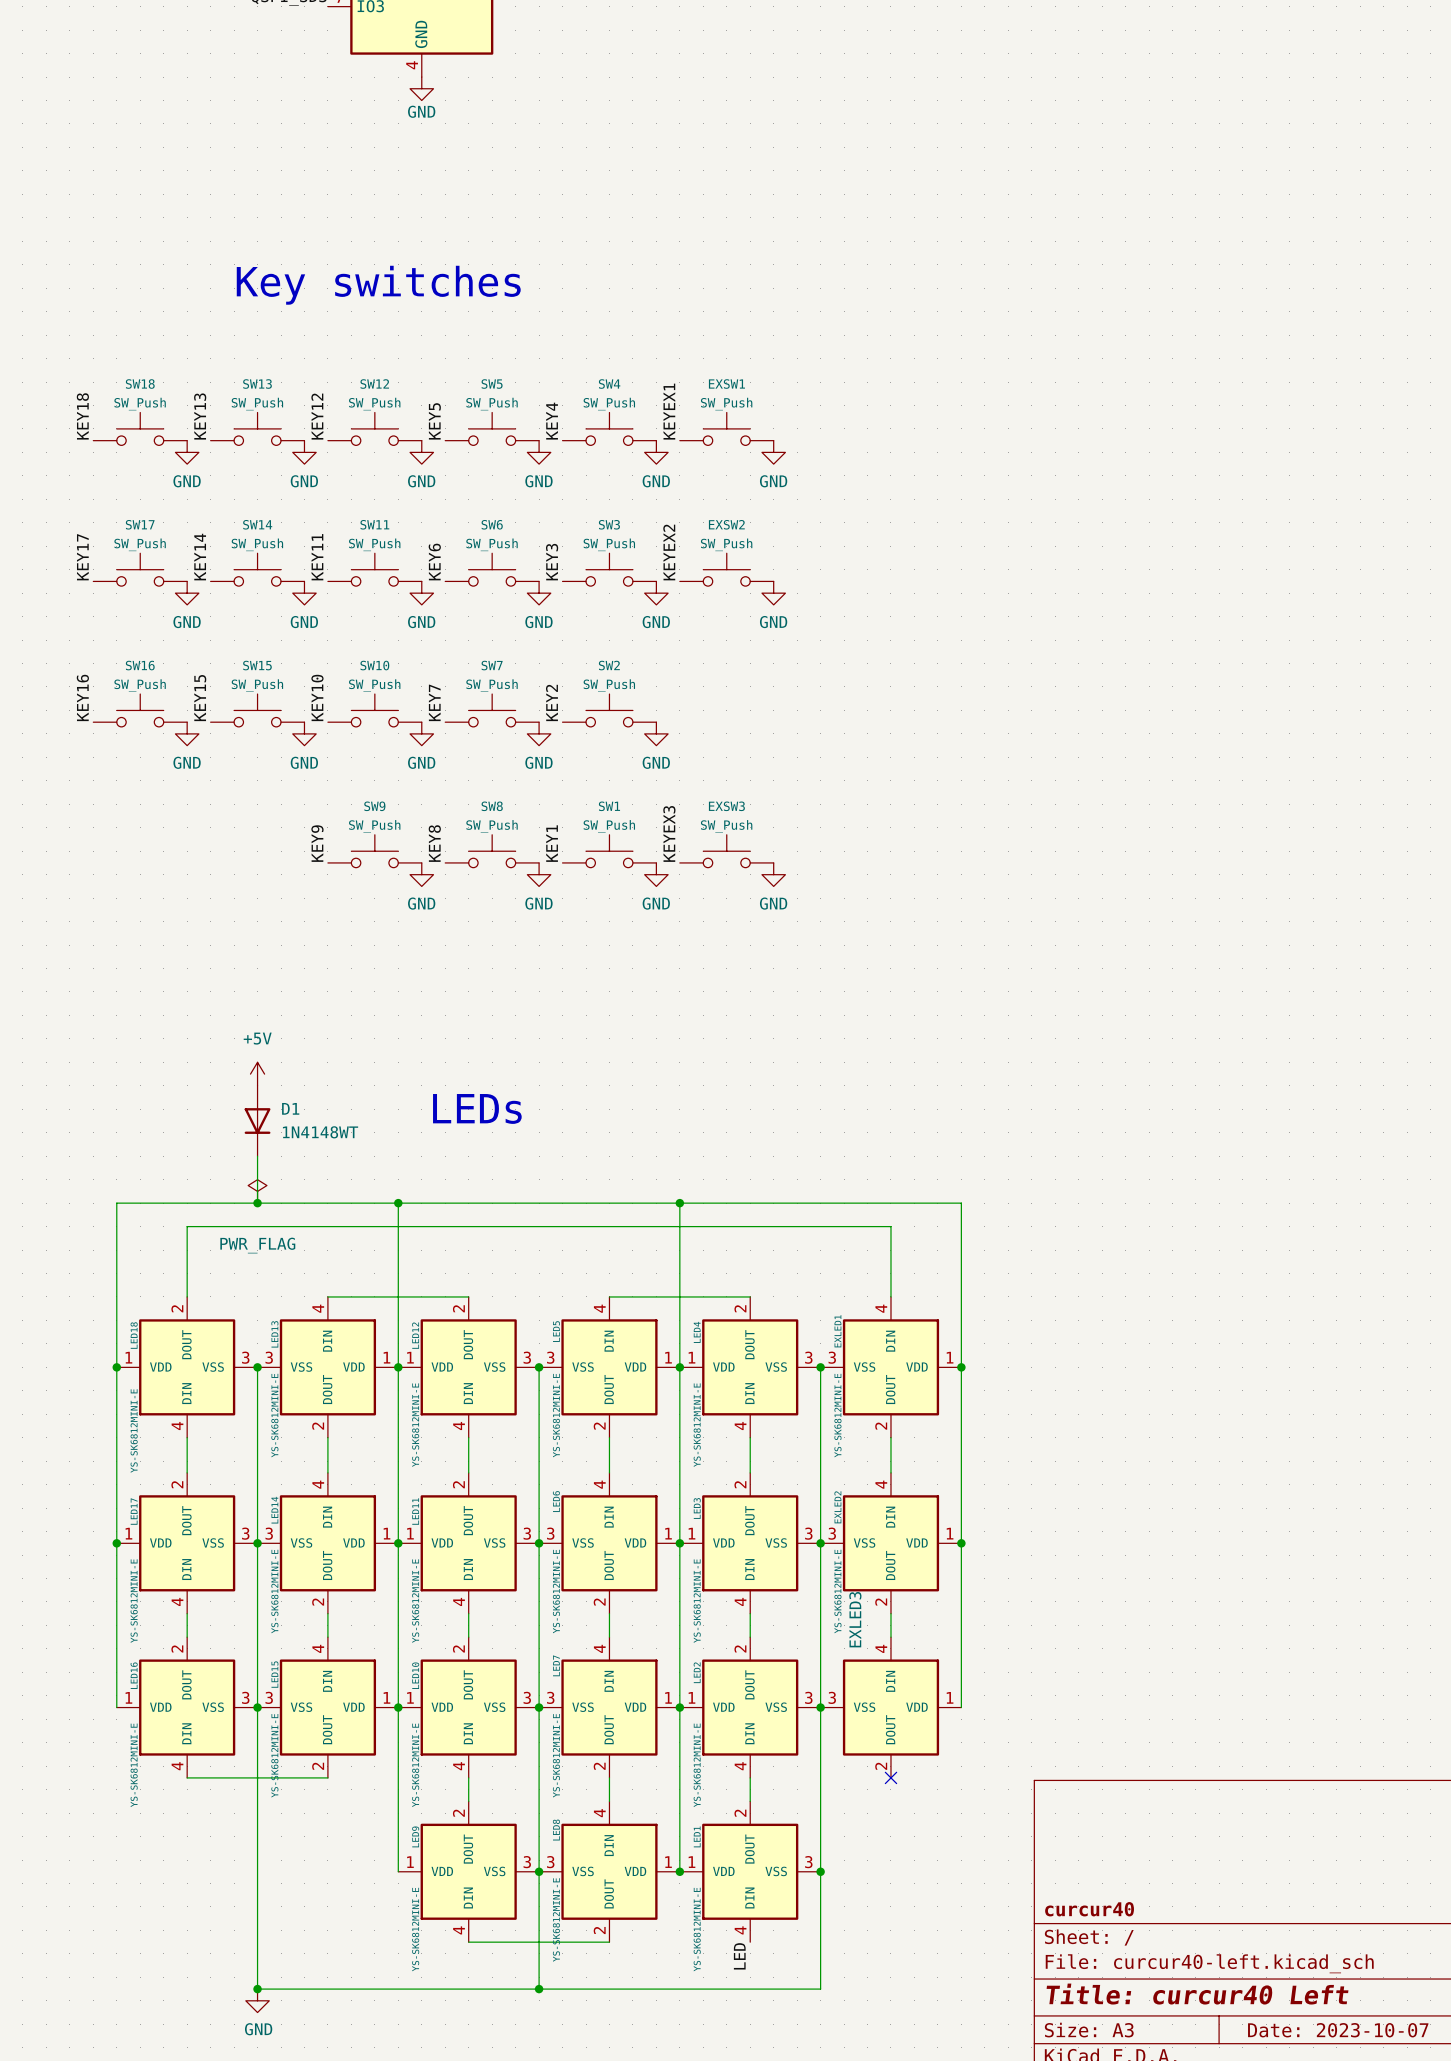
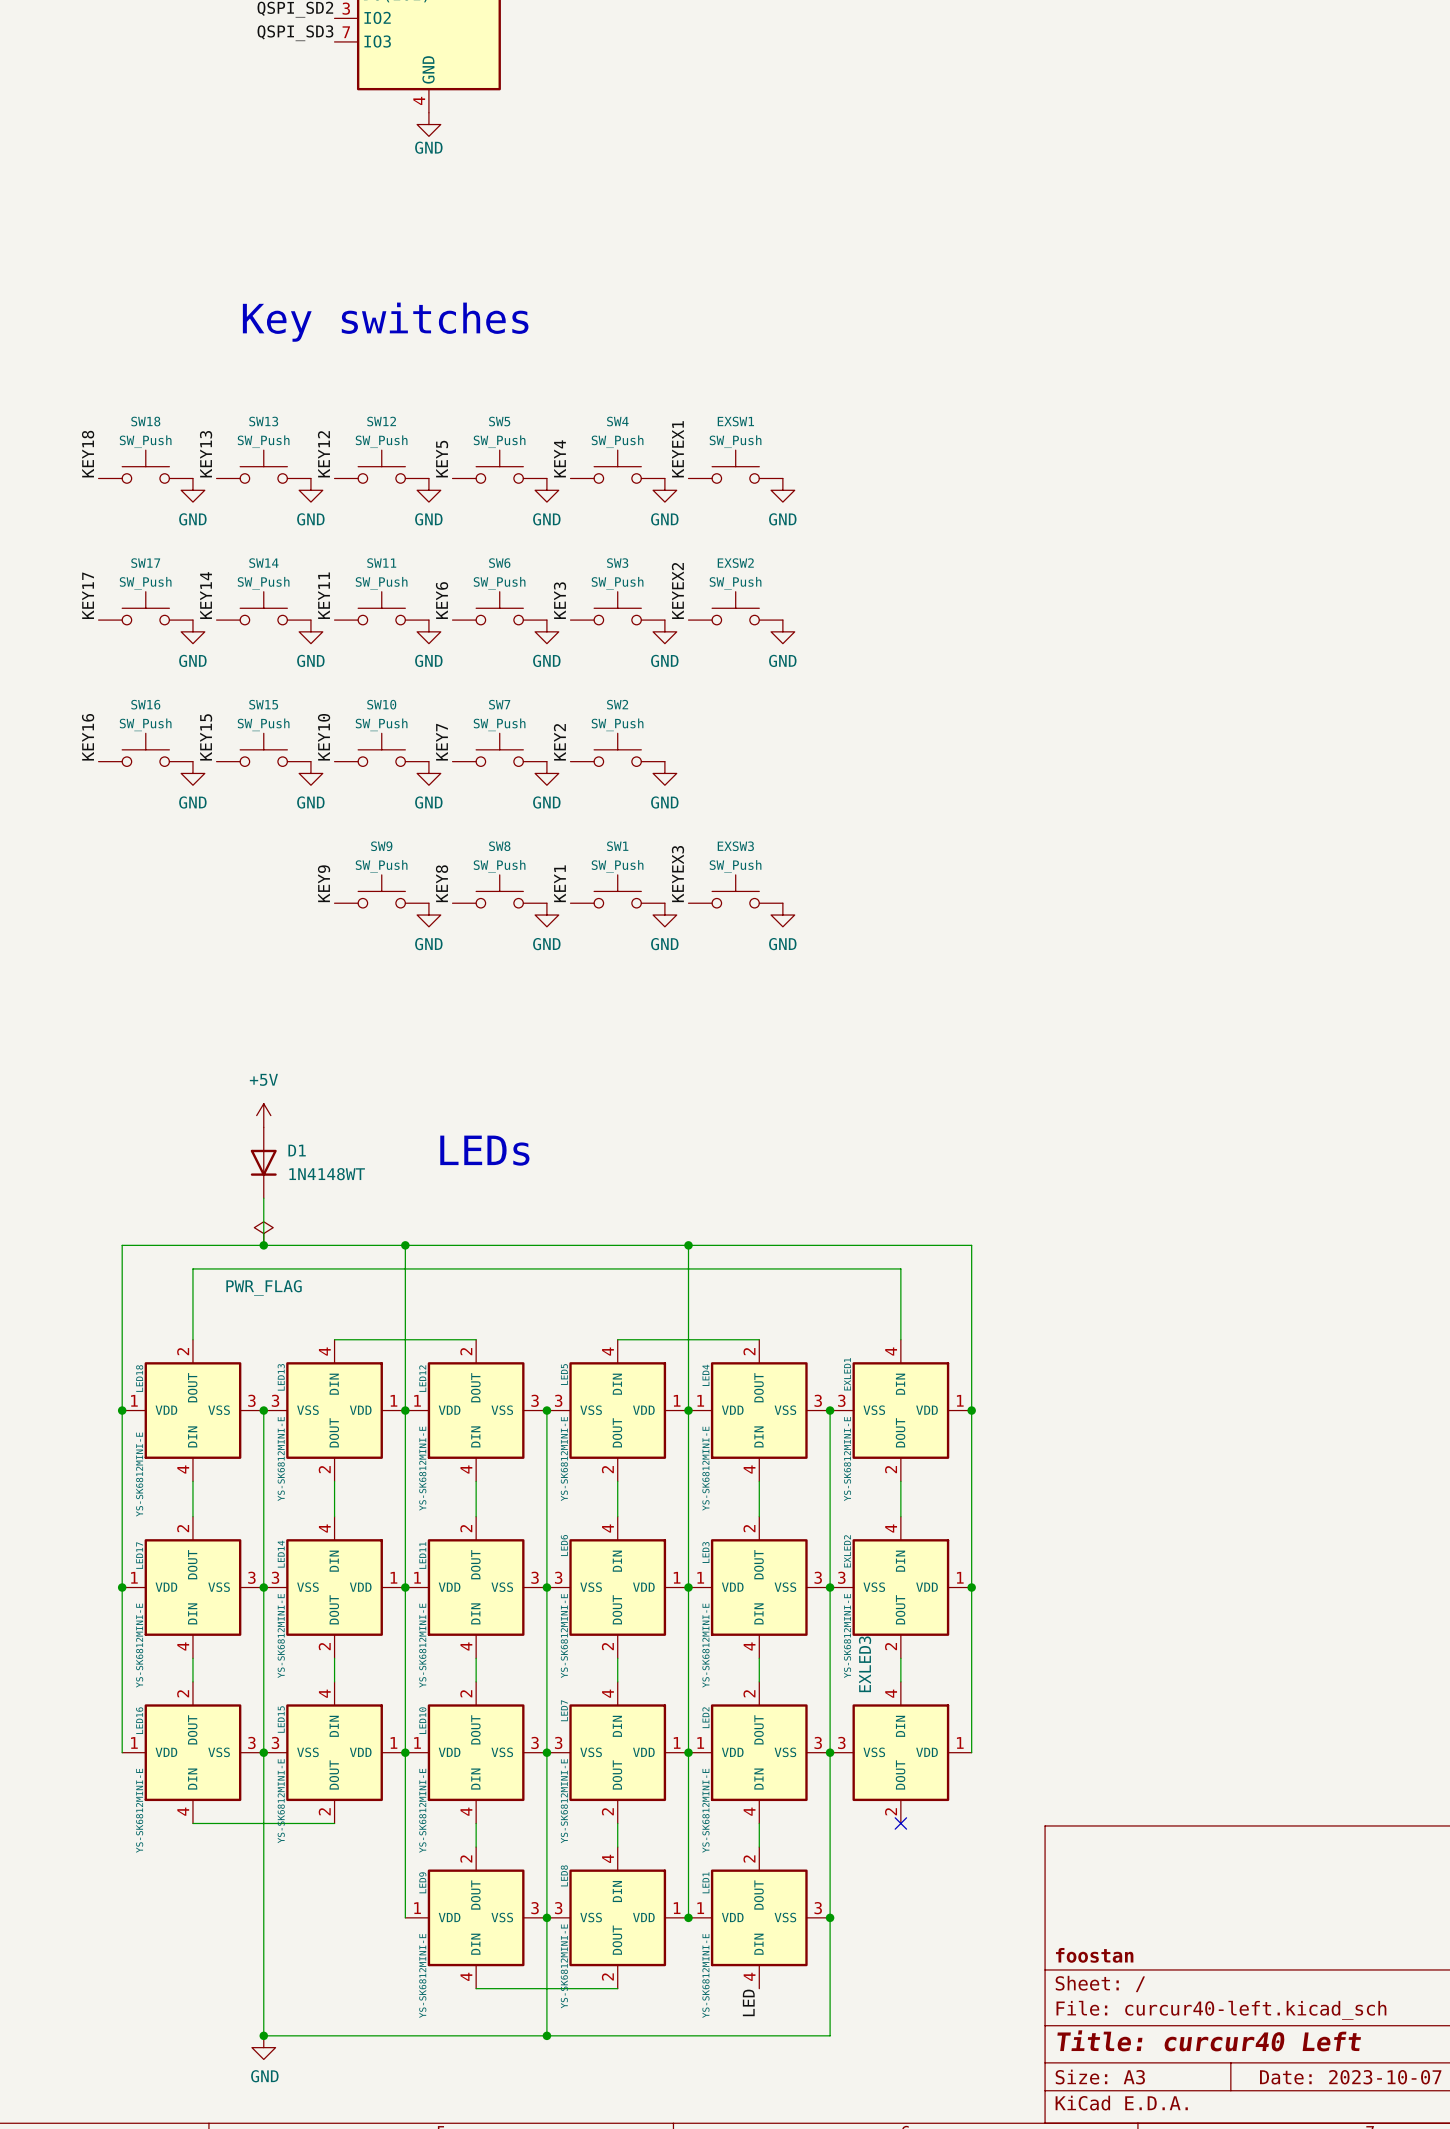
title block: curcur40 (1089, 1909) -> foostan (1094, 1955)

